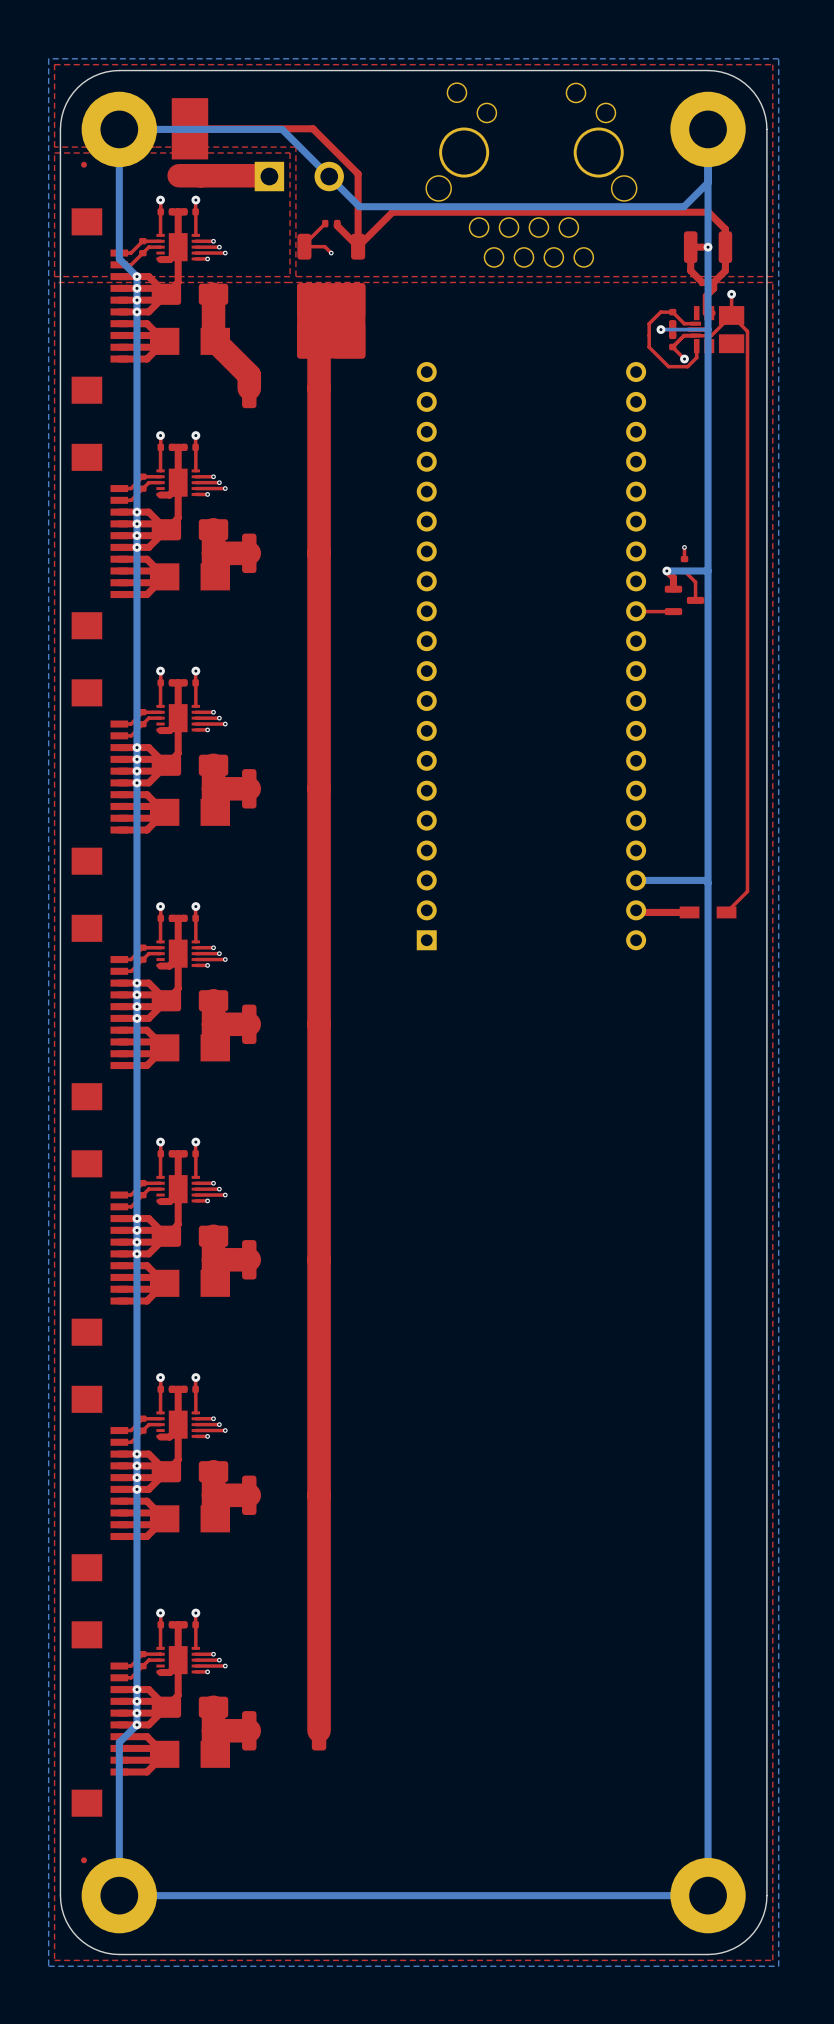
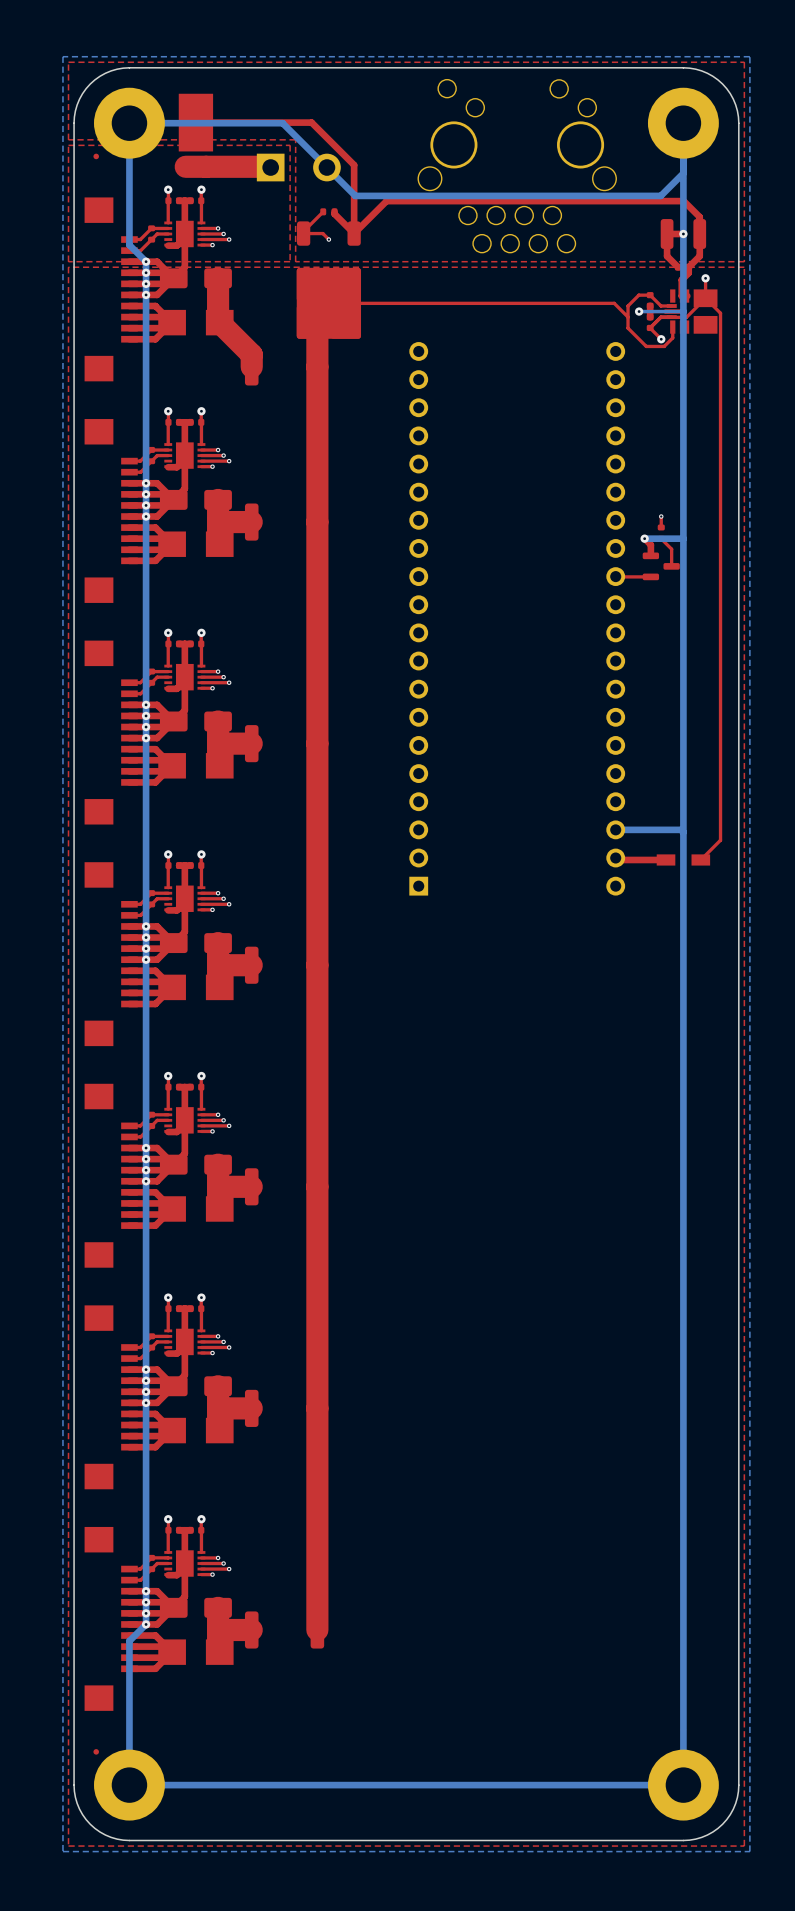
top track: none -> (328, 303) (614, 303) (628, 317)

